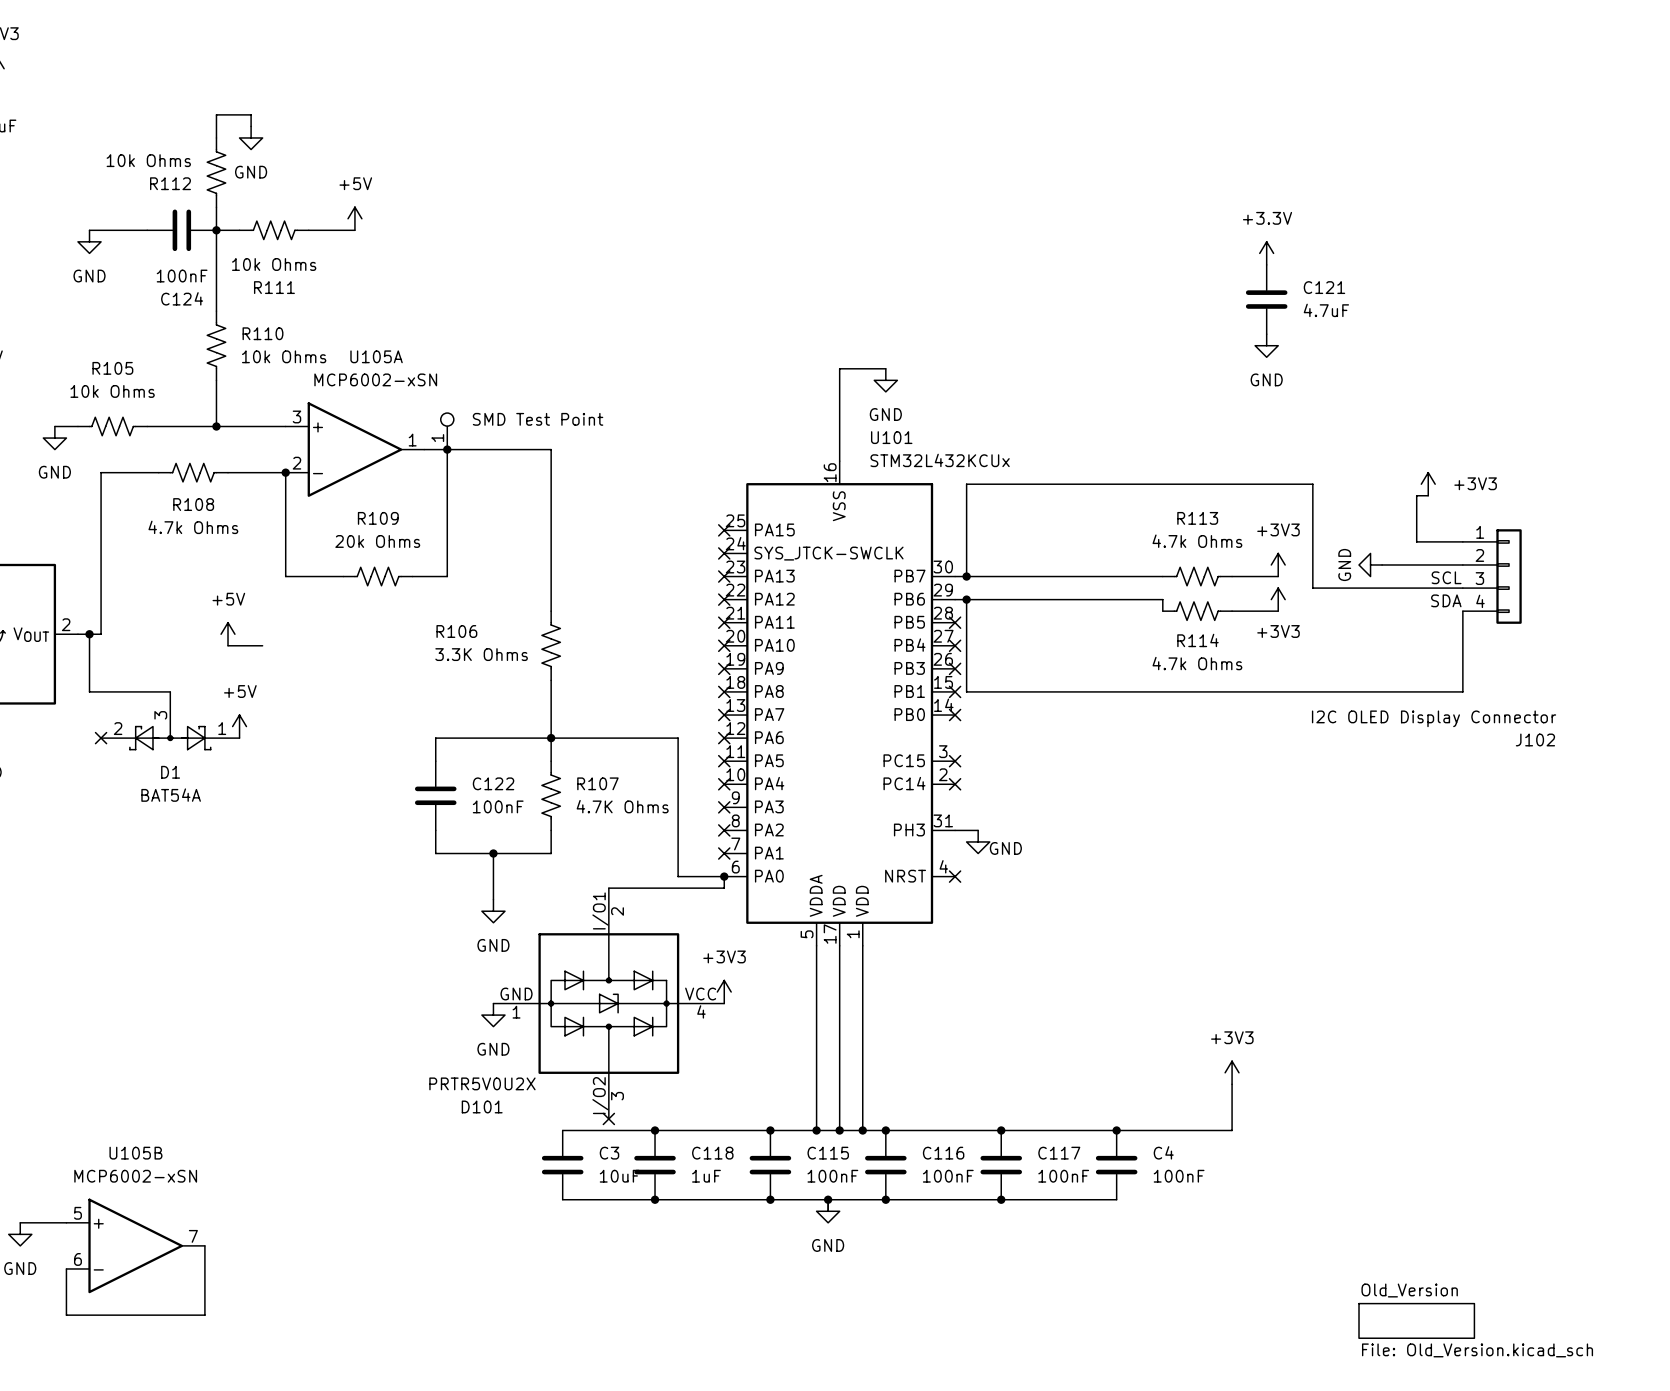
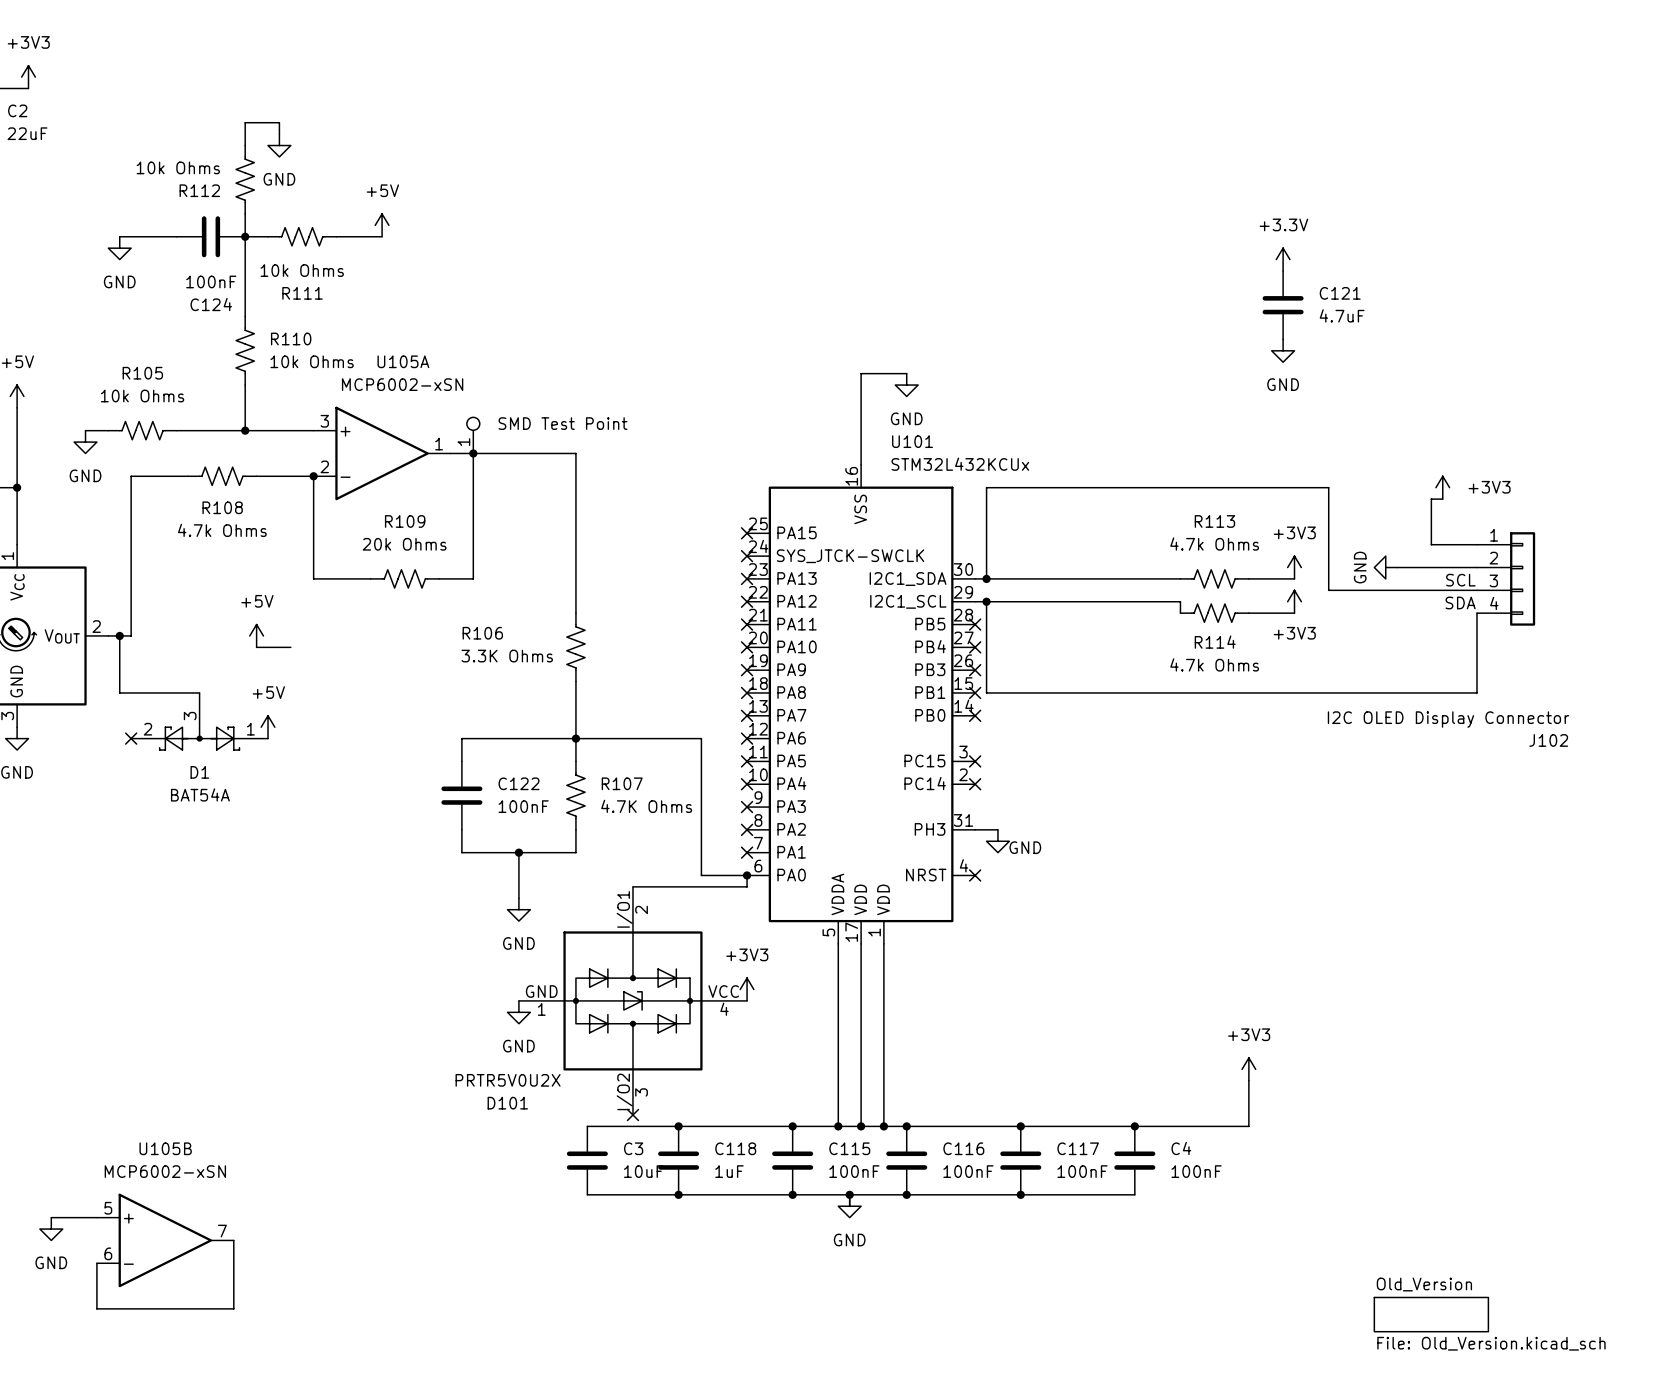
U101 pin name: PB7 (909, 576) -> I2C1_SDA (908, 579)
U101 pin name: PB6 (909, 599) -> I2C1_SCL (908, 601)

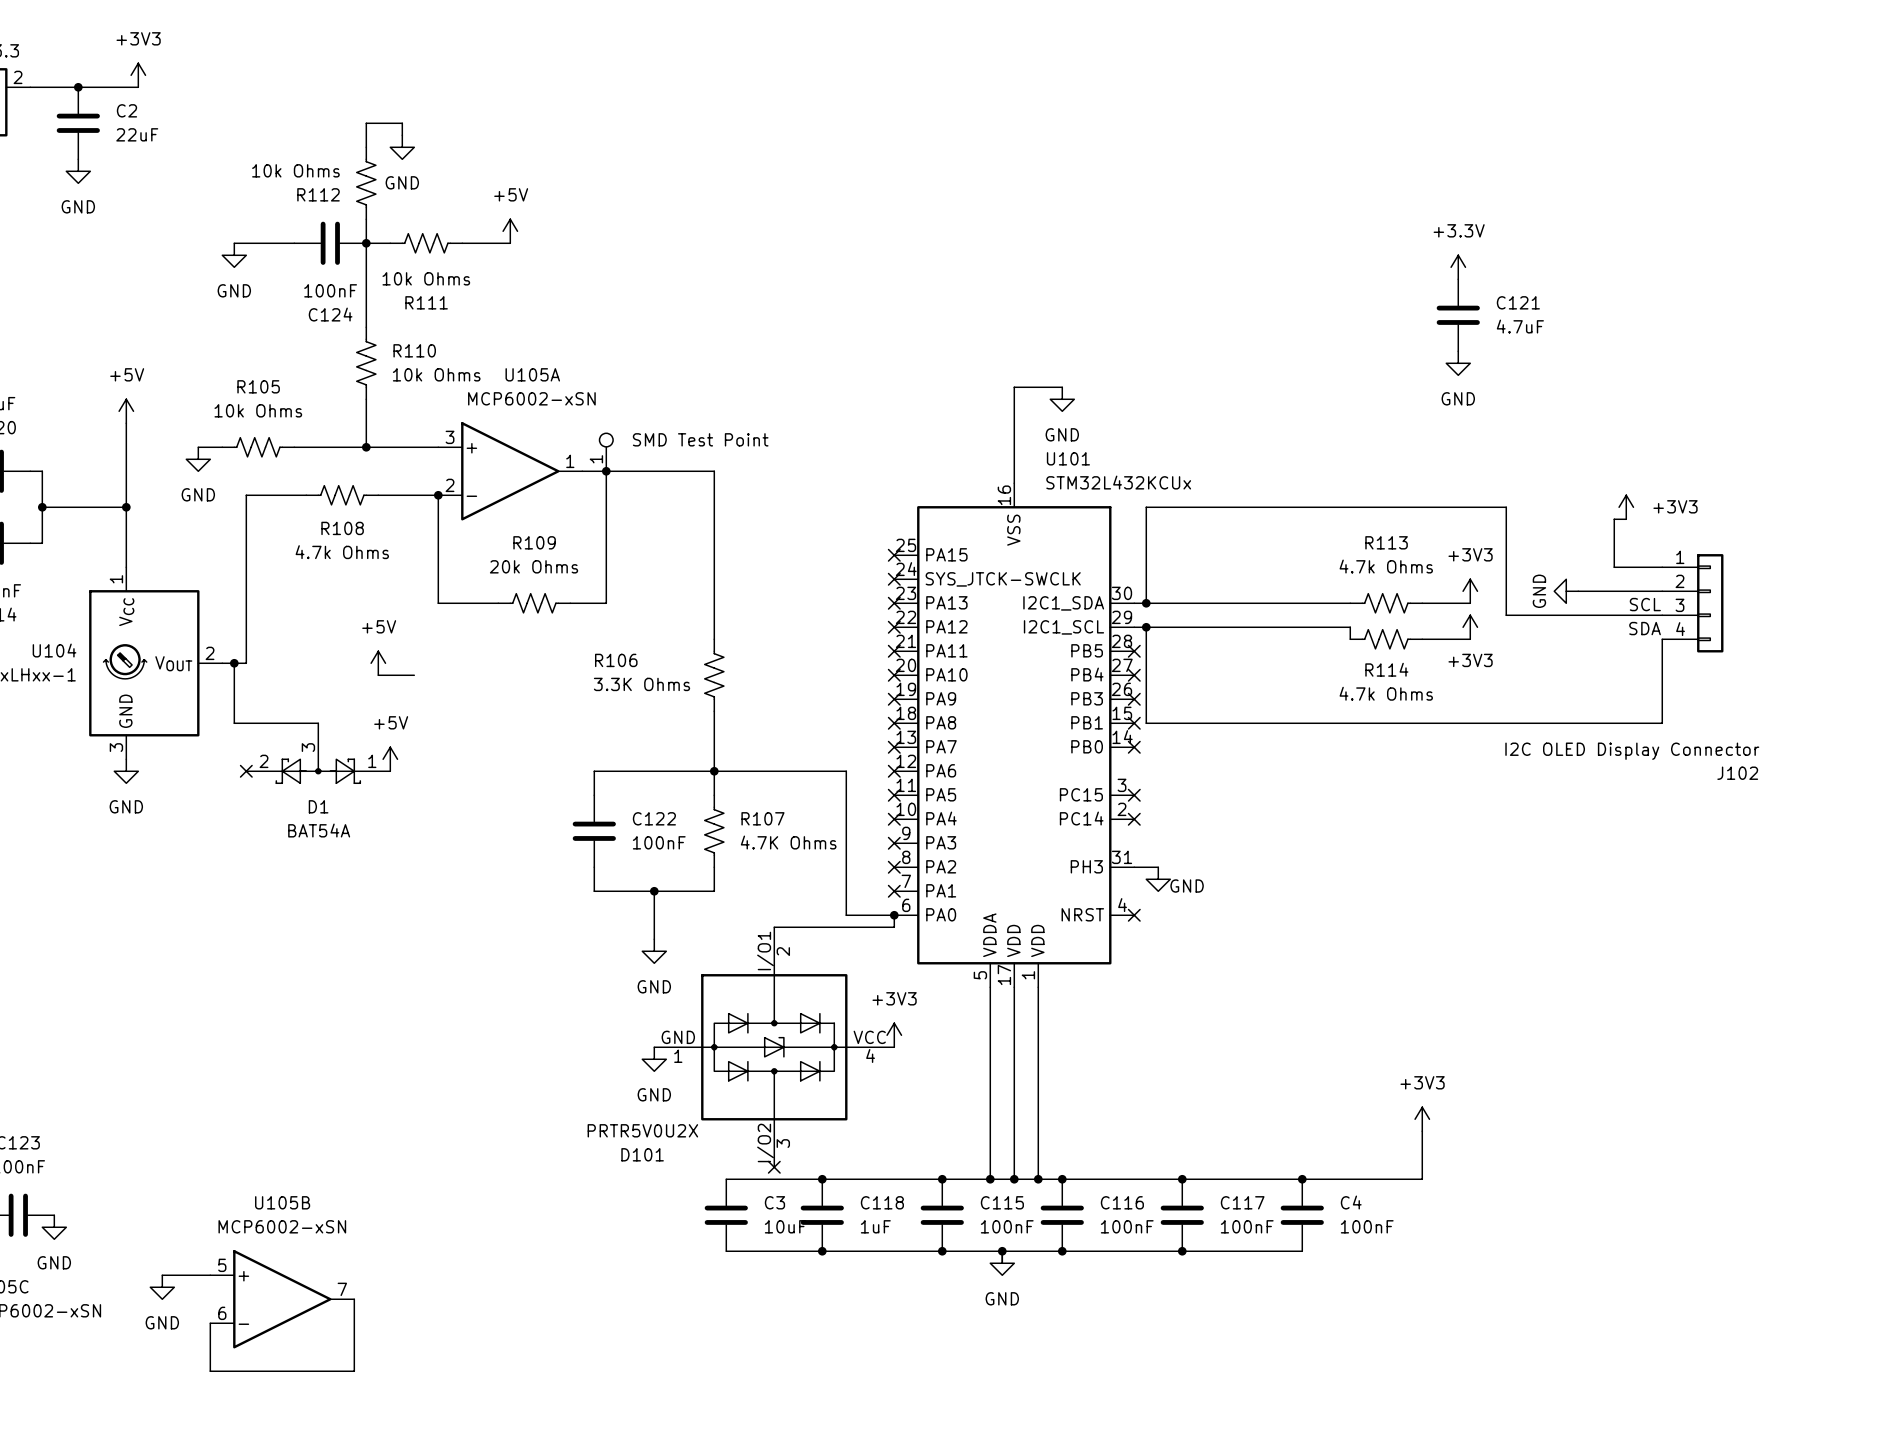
sheet Old_Version: File: Old_Version.kicad_sch (1431, 1314) -> none

